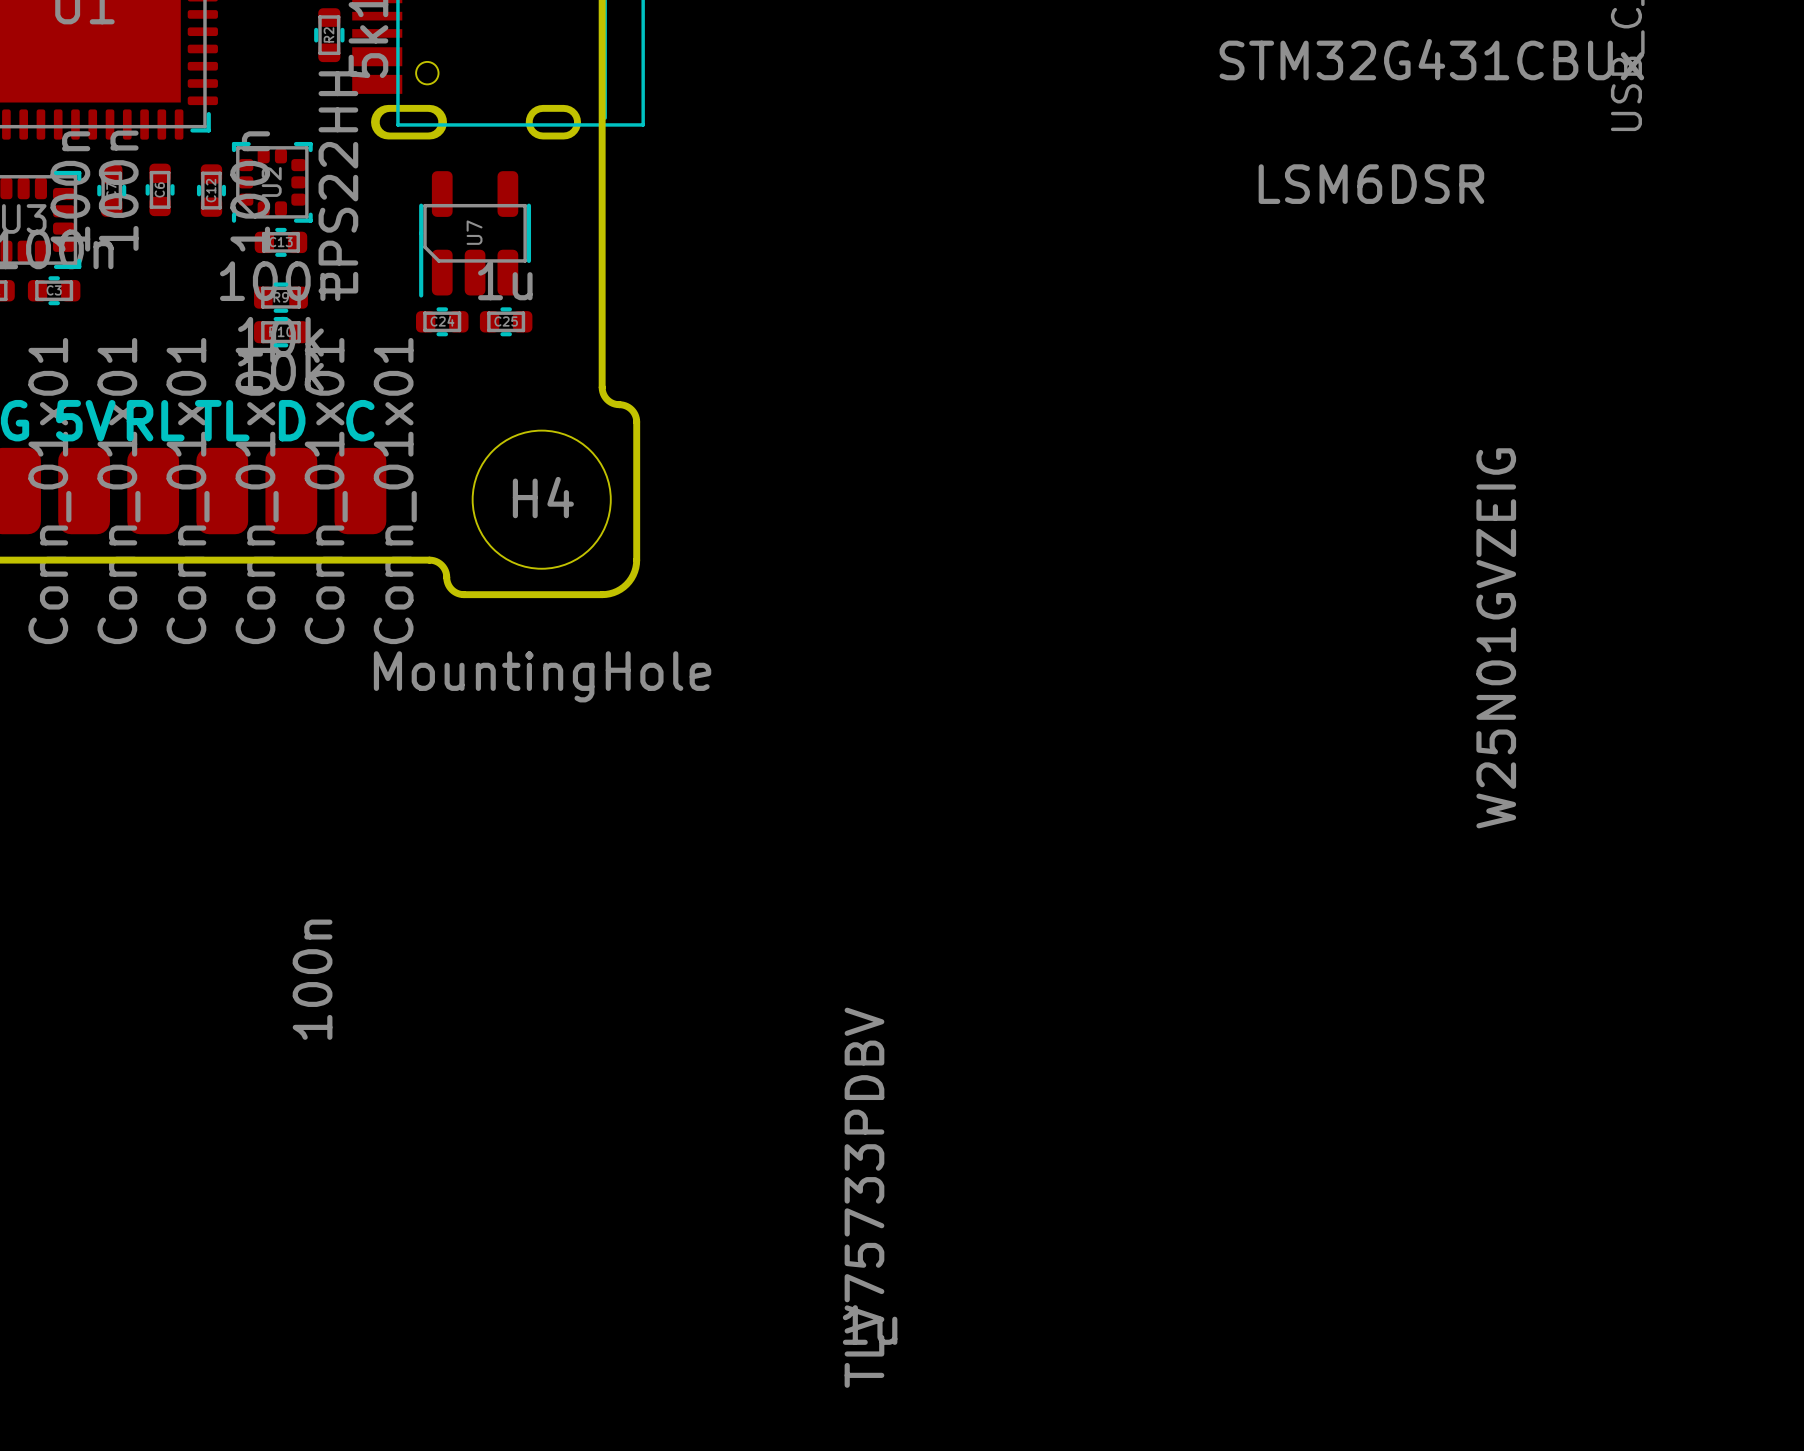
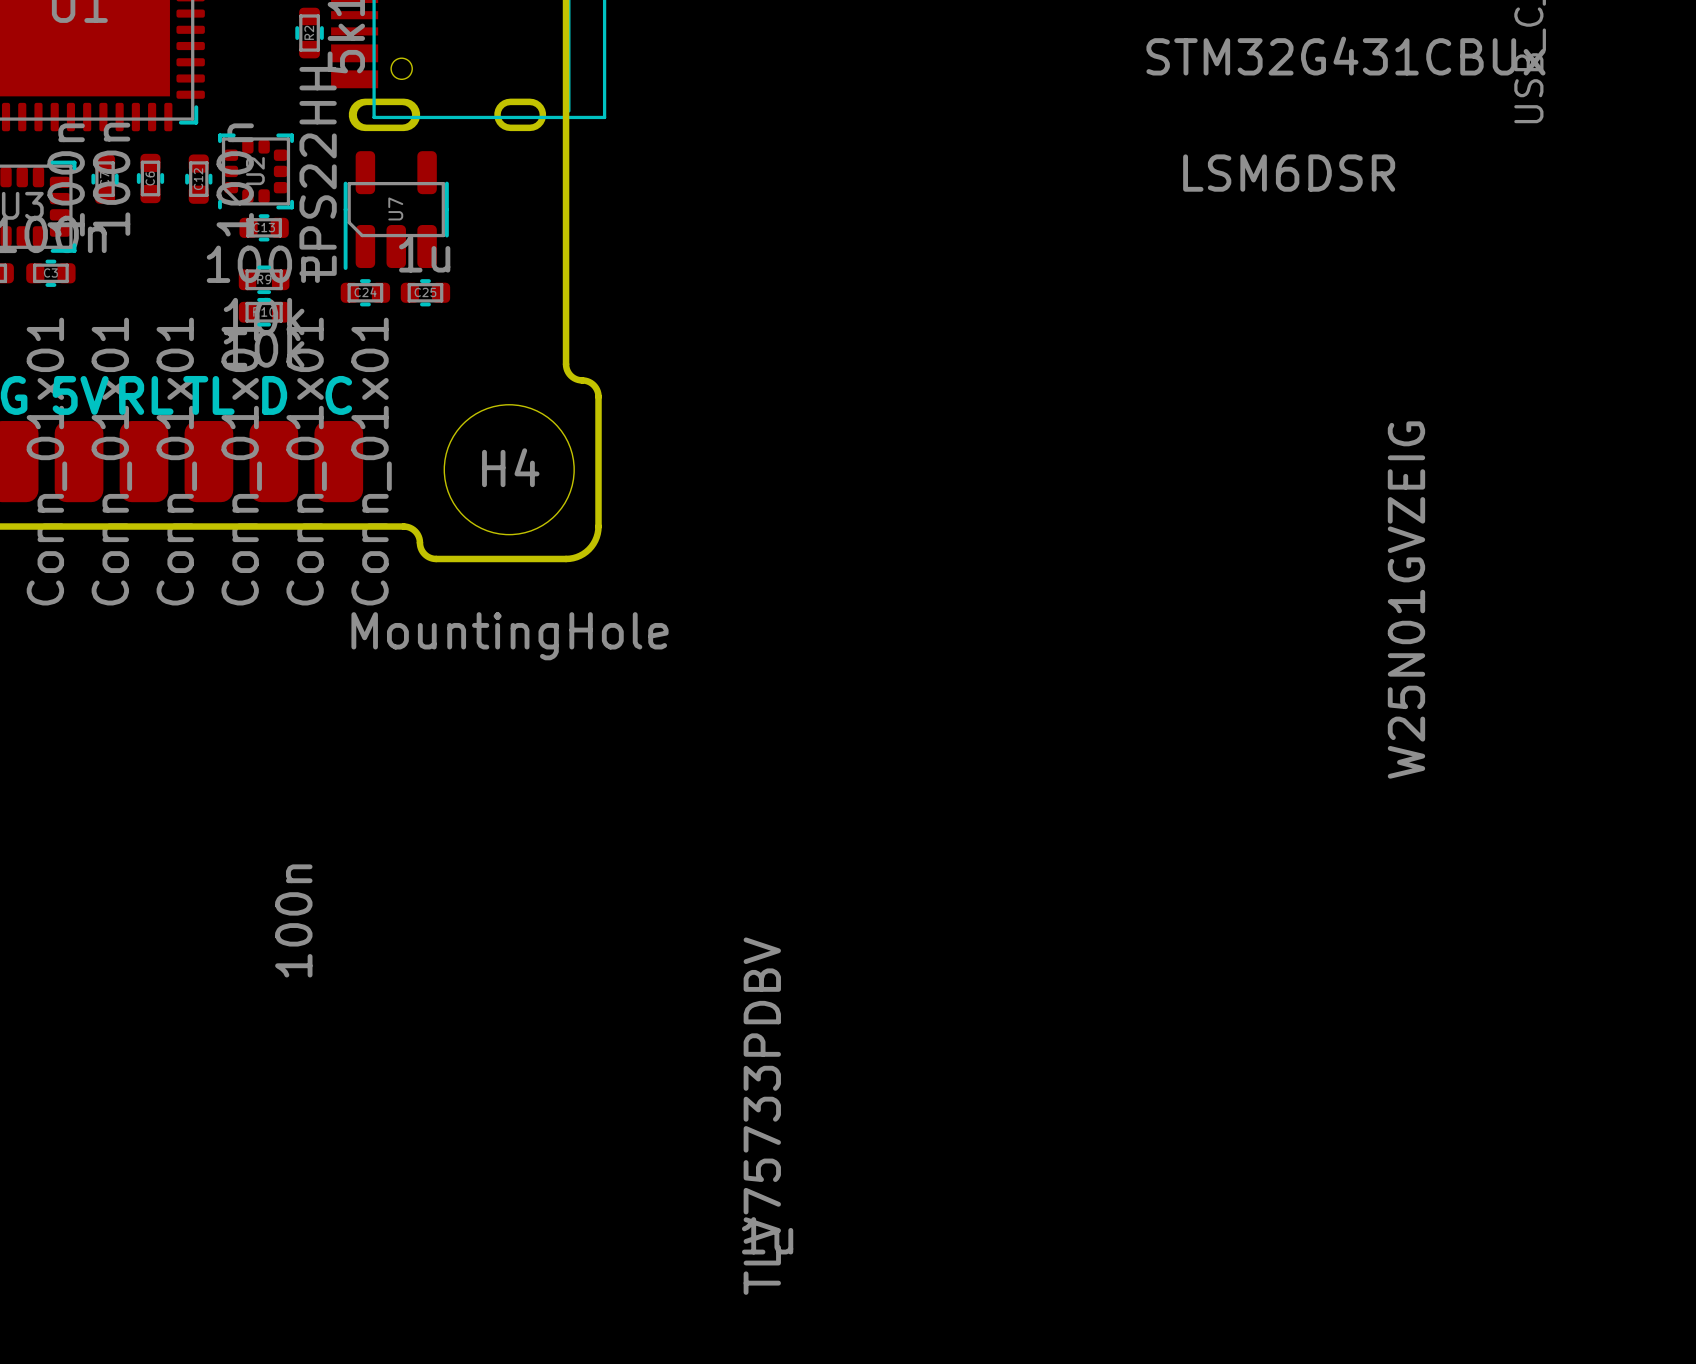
U7 position: (475, 234) -> (396, 210)
C24 position: (442, 321) -> (365, 292)
C25 position: (506, 321) -> (425, 292)

